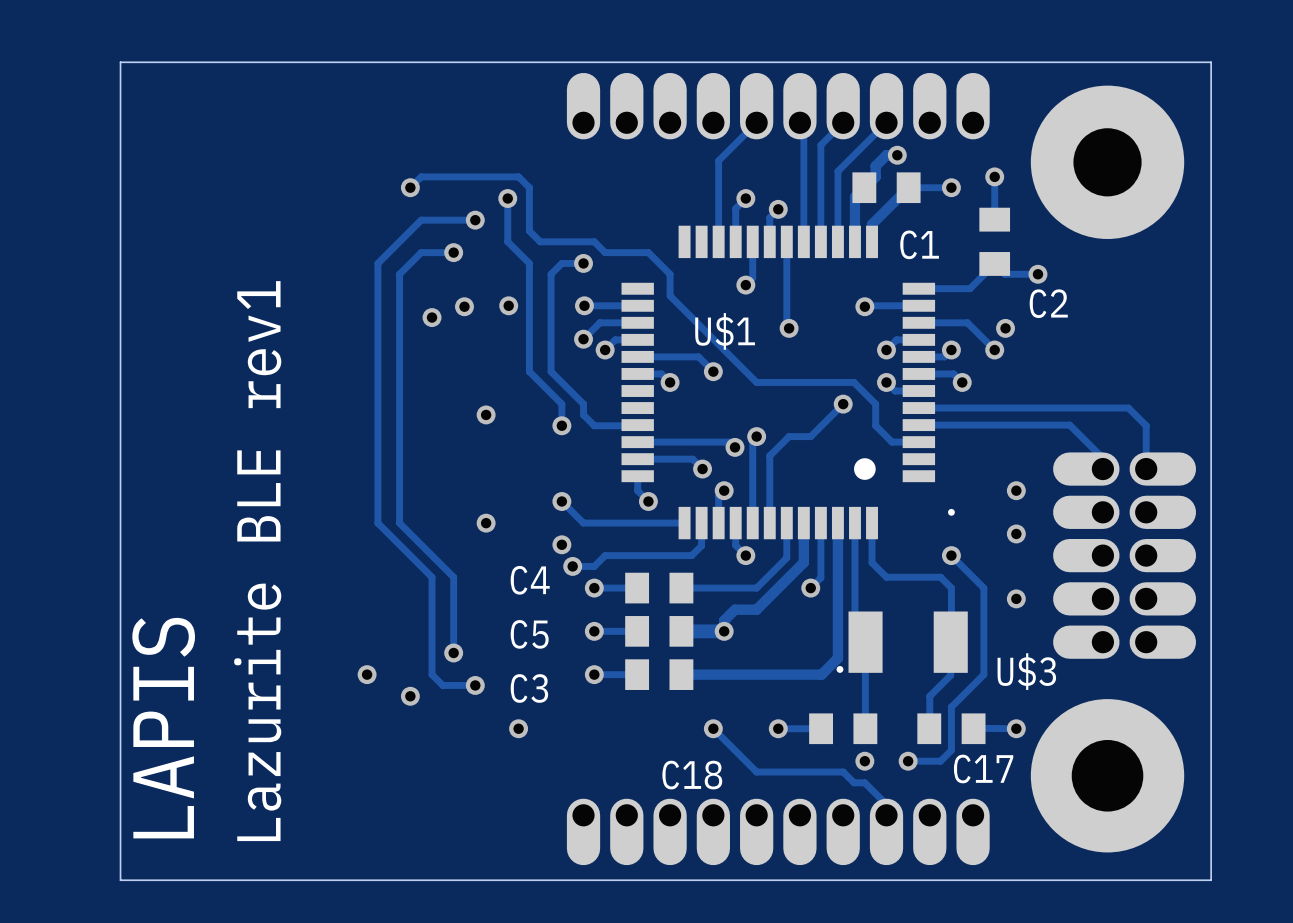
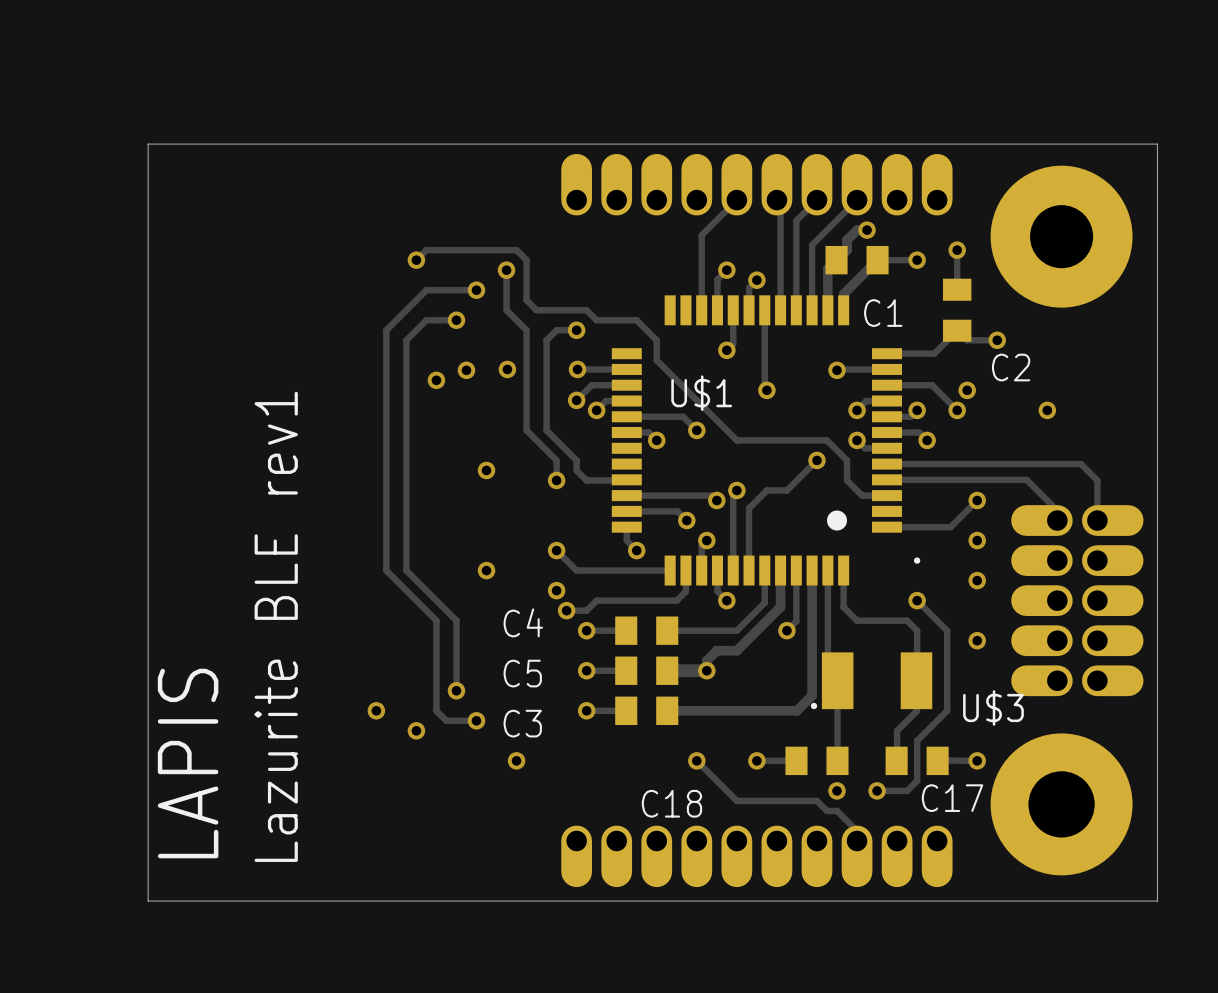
via: none -> (1047, 410)
track: none -> (977, 500) (950, 527) (887, 527)
via: none -> (977, 500)

